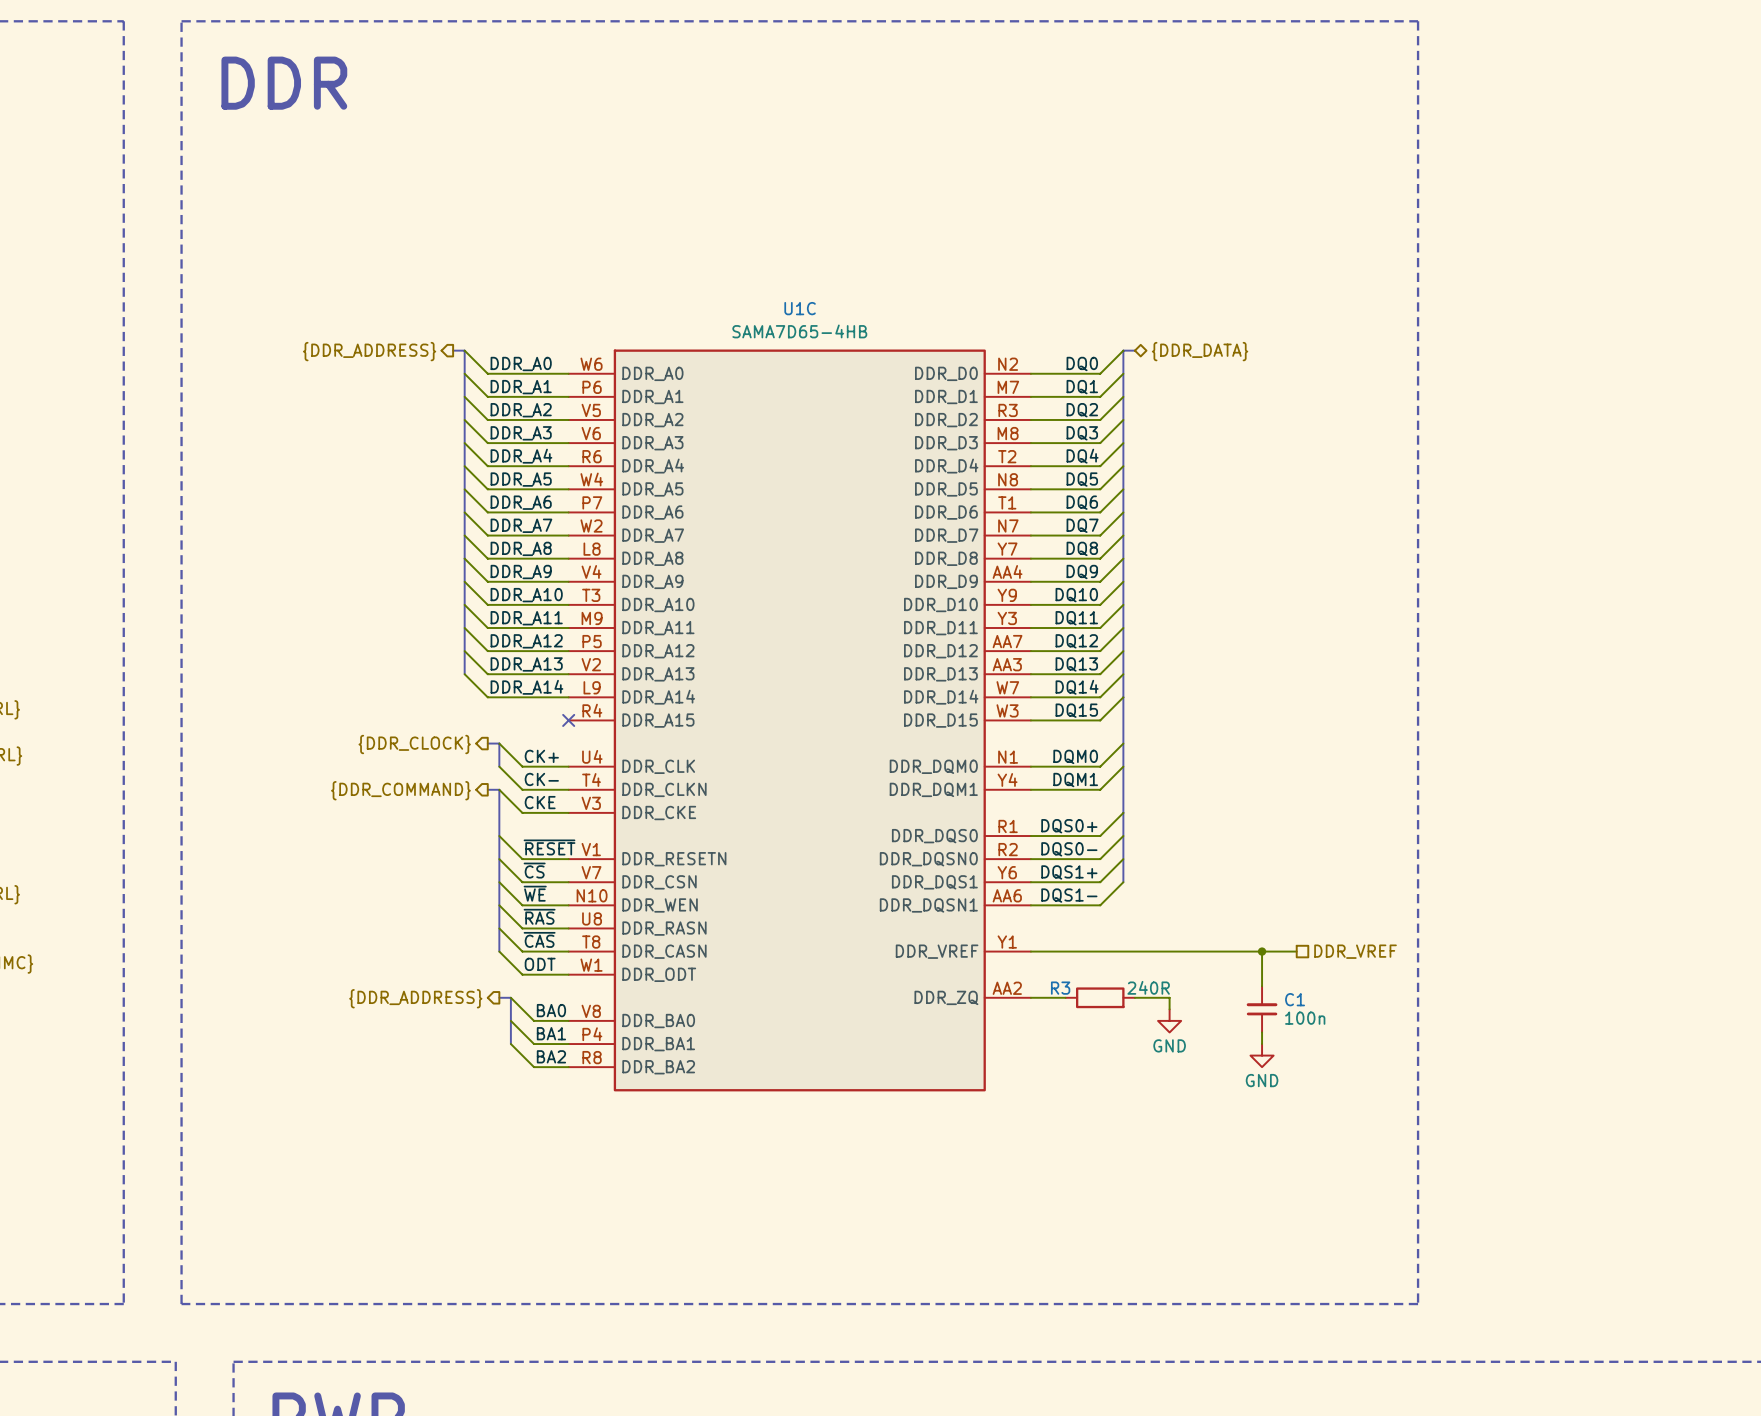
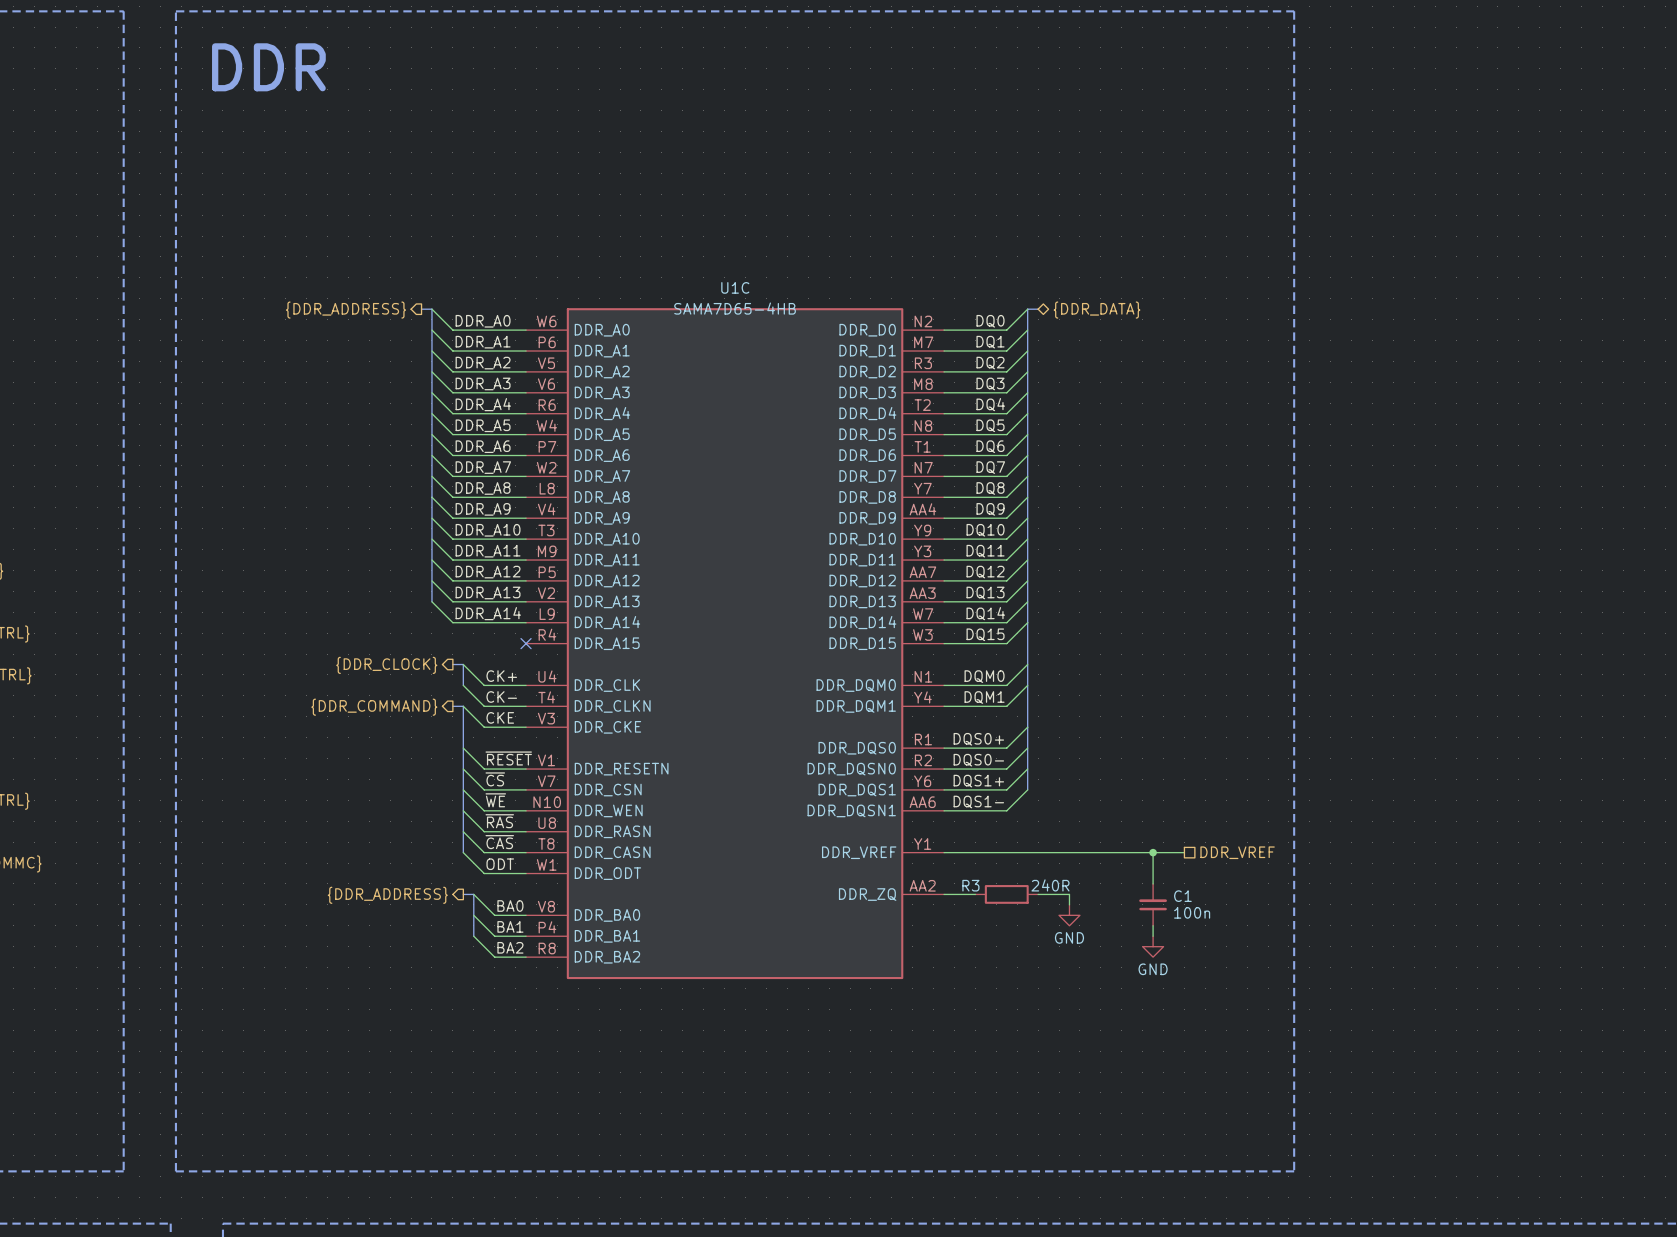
U1C name position: U1C (800, 308) -> U1C (735, 287)
U1C value position: SAMA7D65-4HB (799, 331) -> SAMA7D65-4HB (735, 308)

